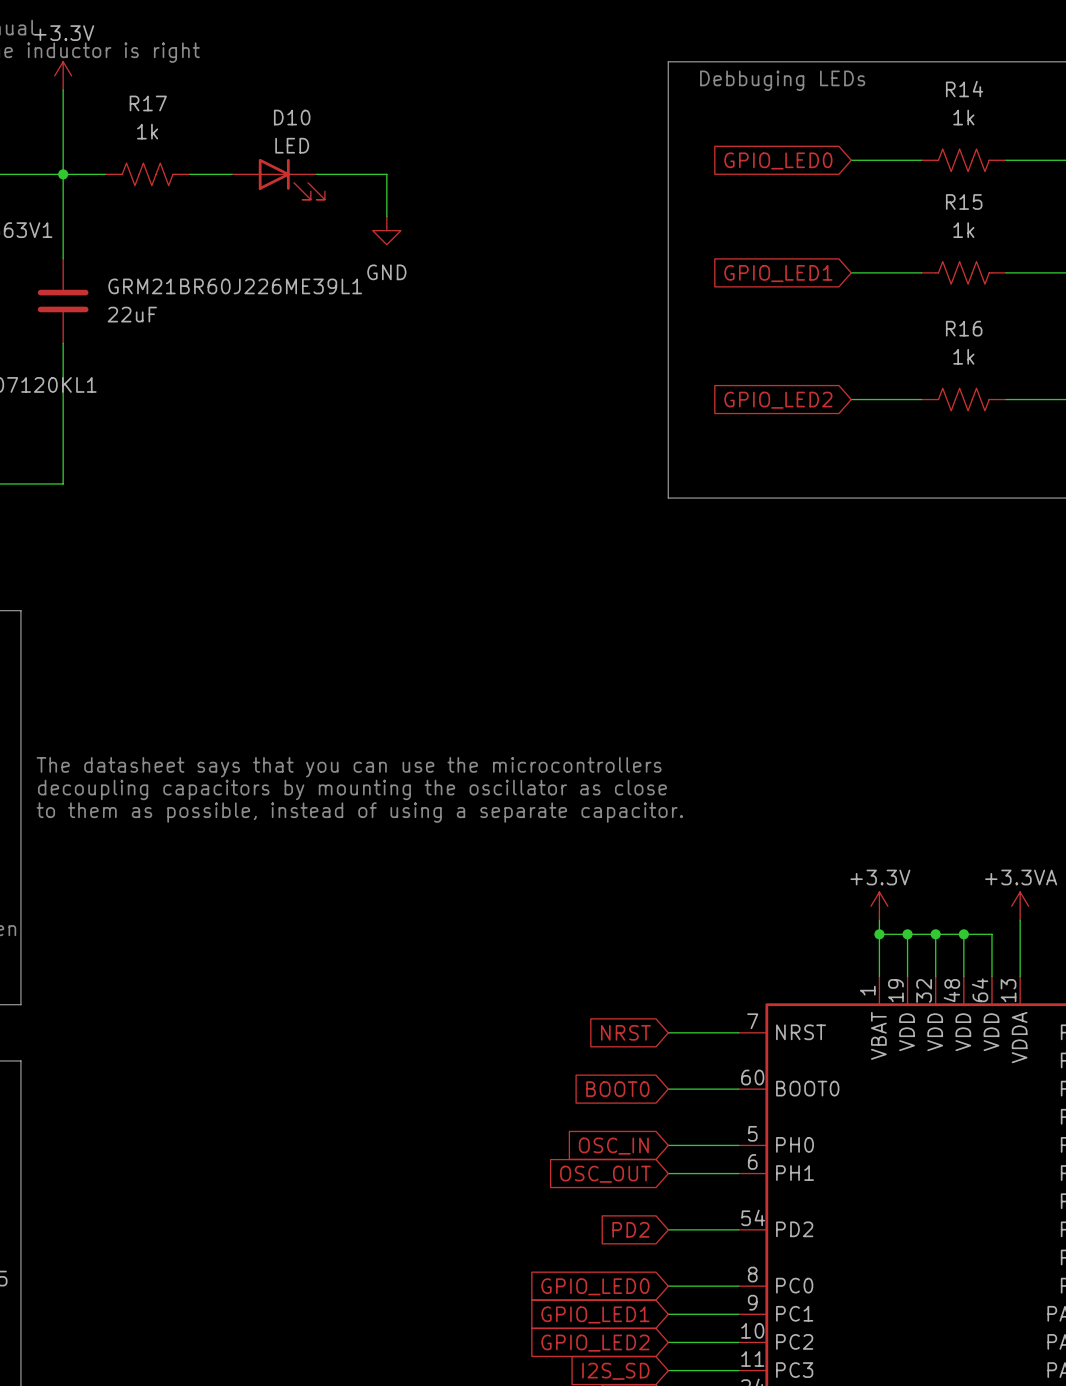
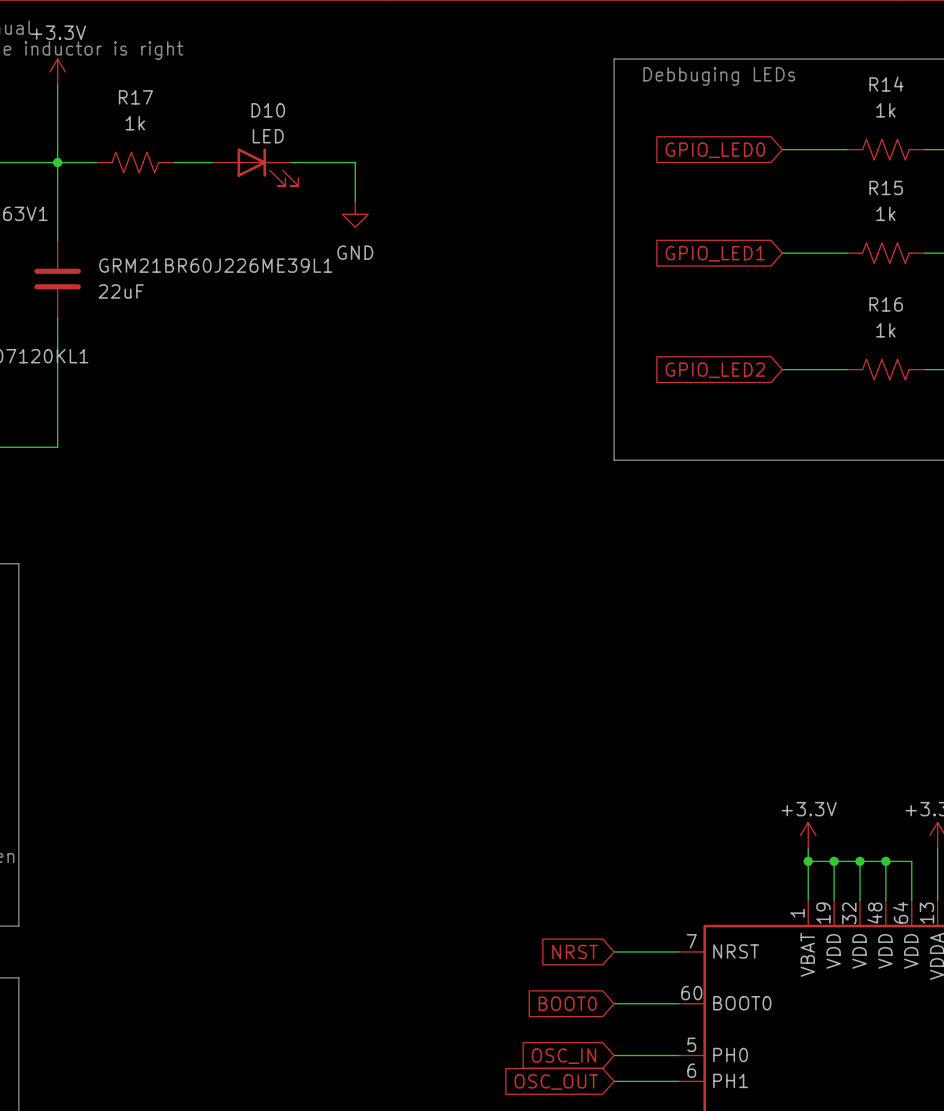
text: The datasheet says that you can use the microcontrollers (349, 767) -> none
text: decoupling capacitors by mounting the oscillator as close (352, 789) -> none
text: to them as possible, instead of using a separate capacitor. (359, 812) -> none

